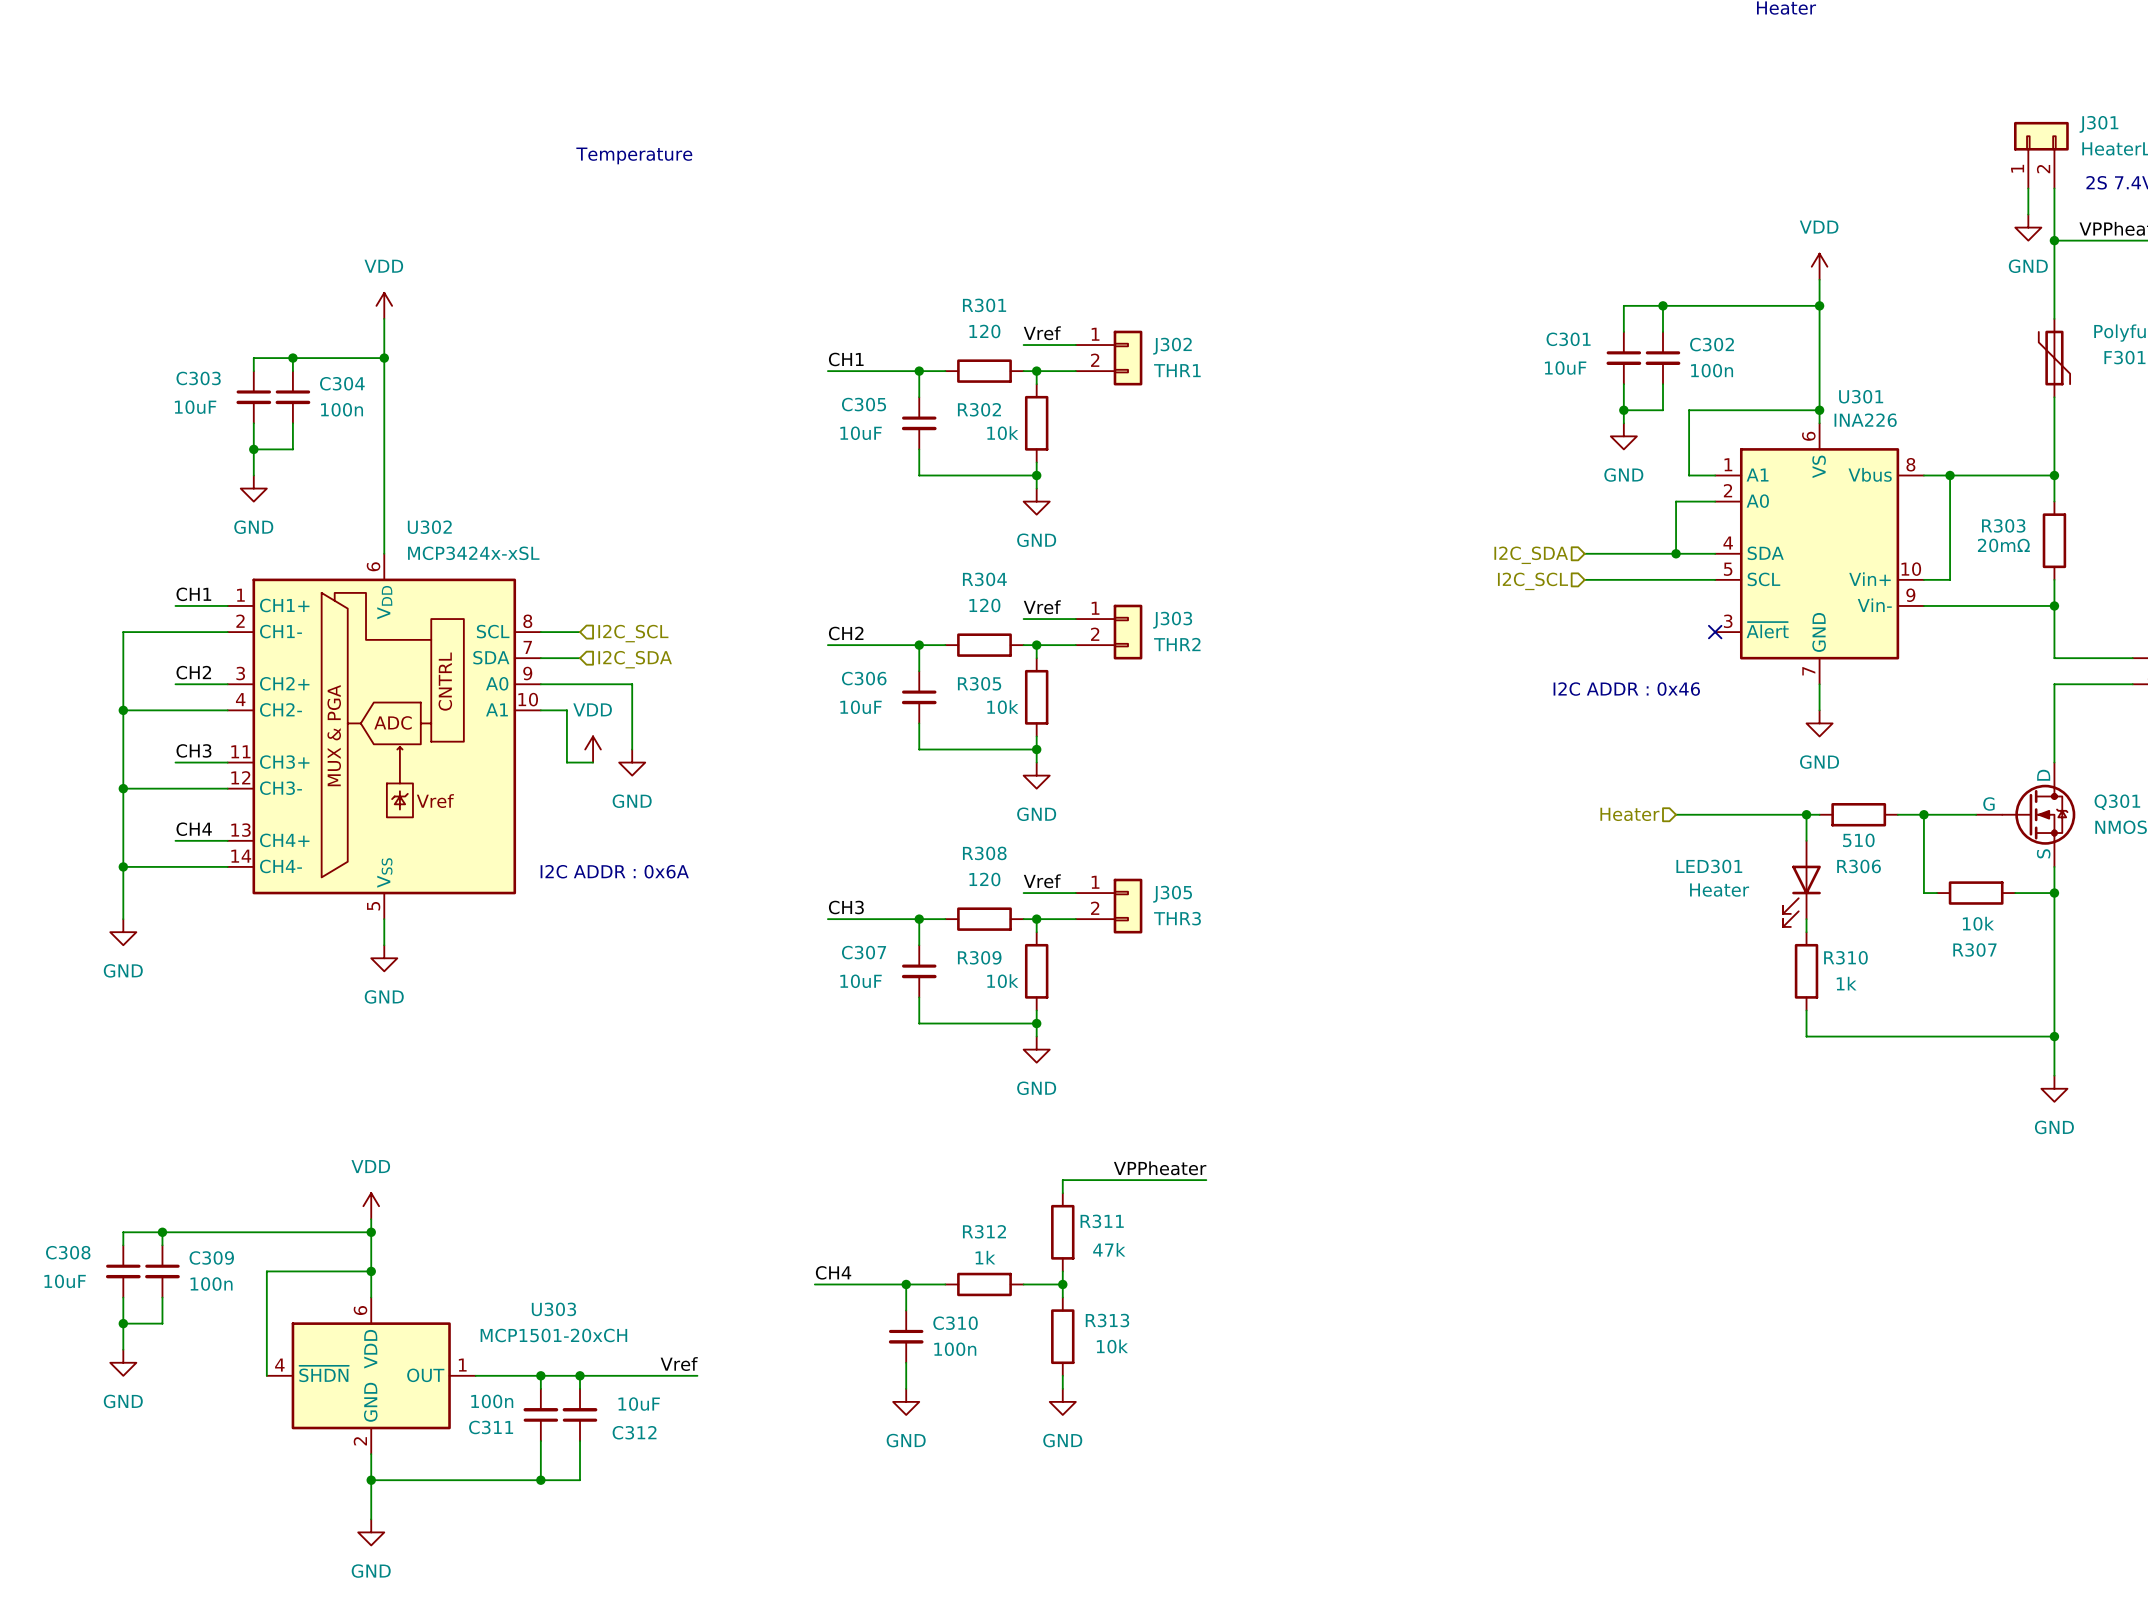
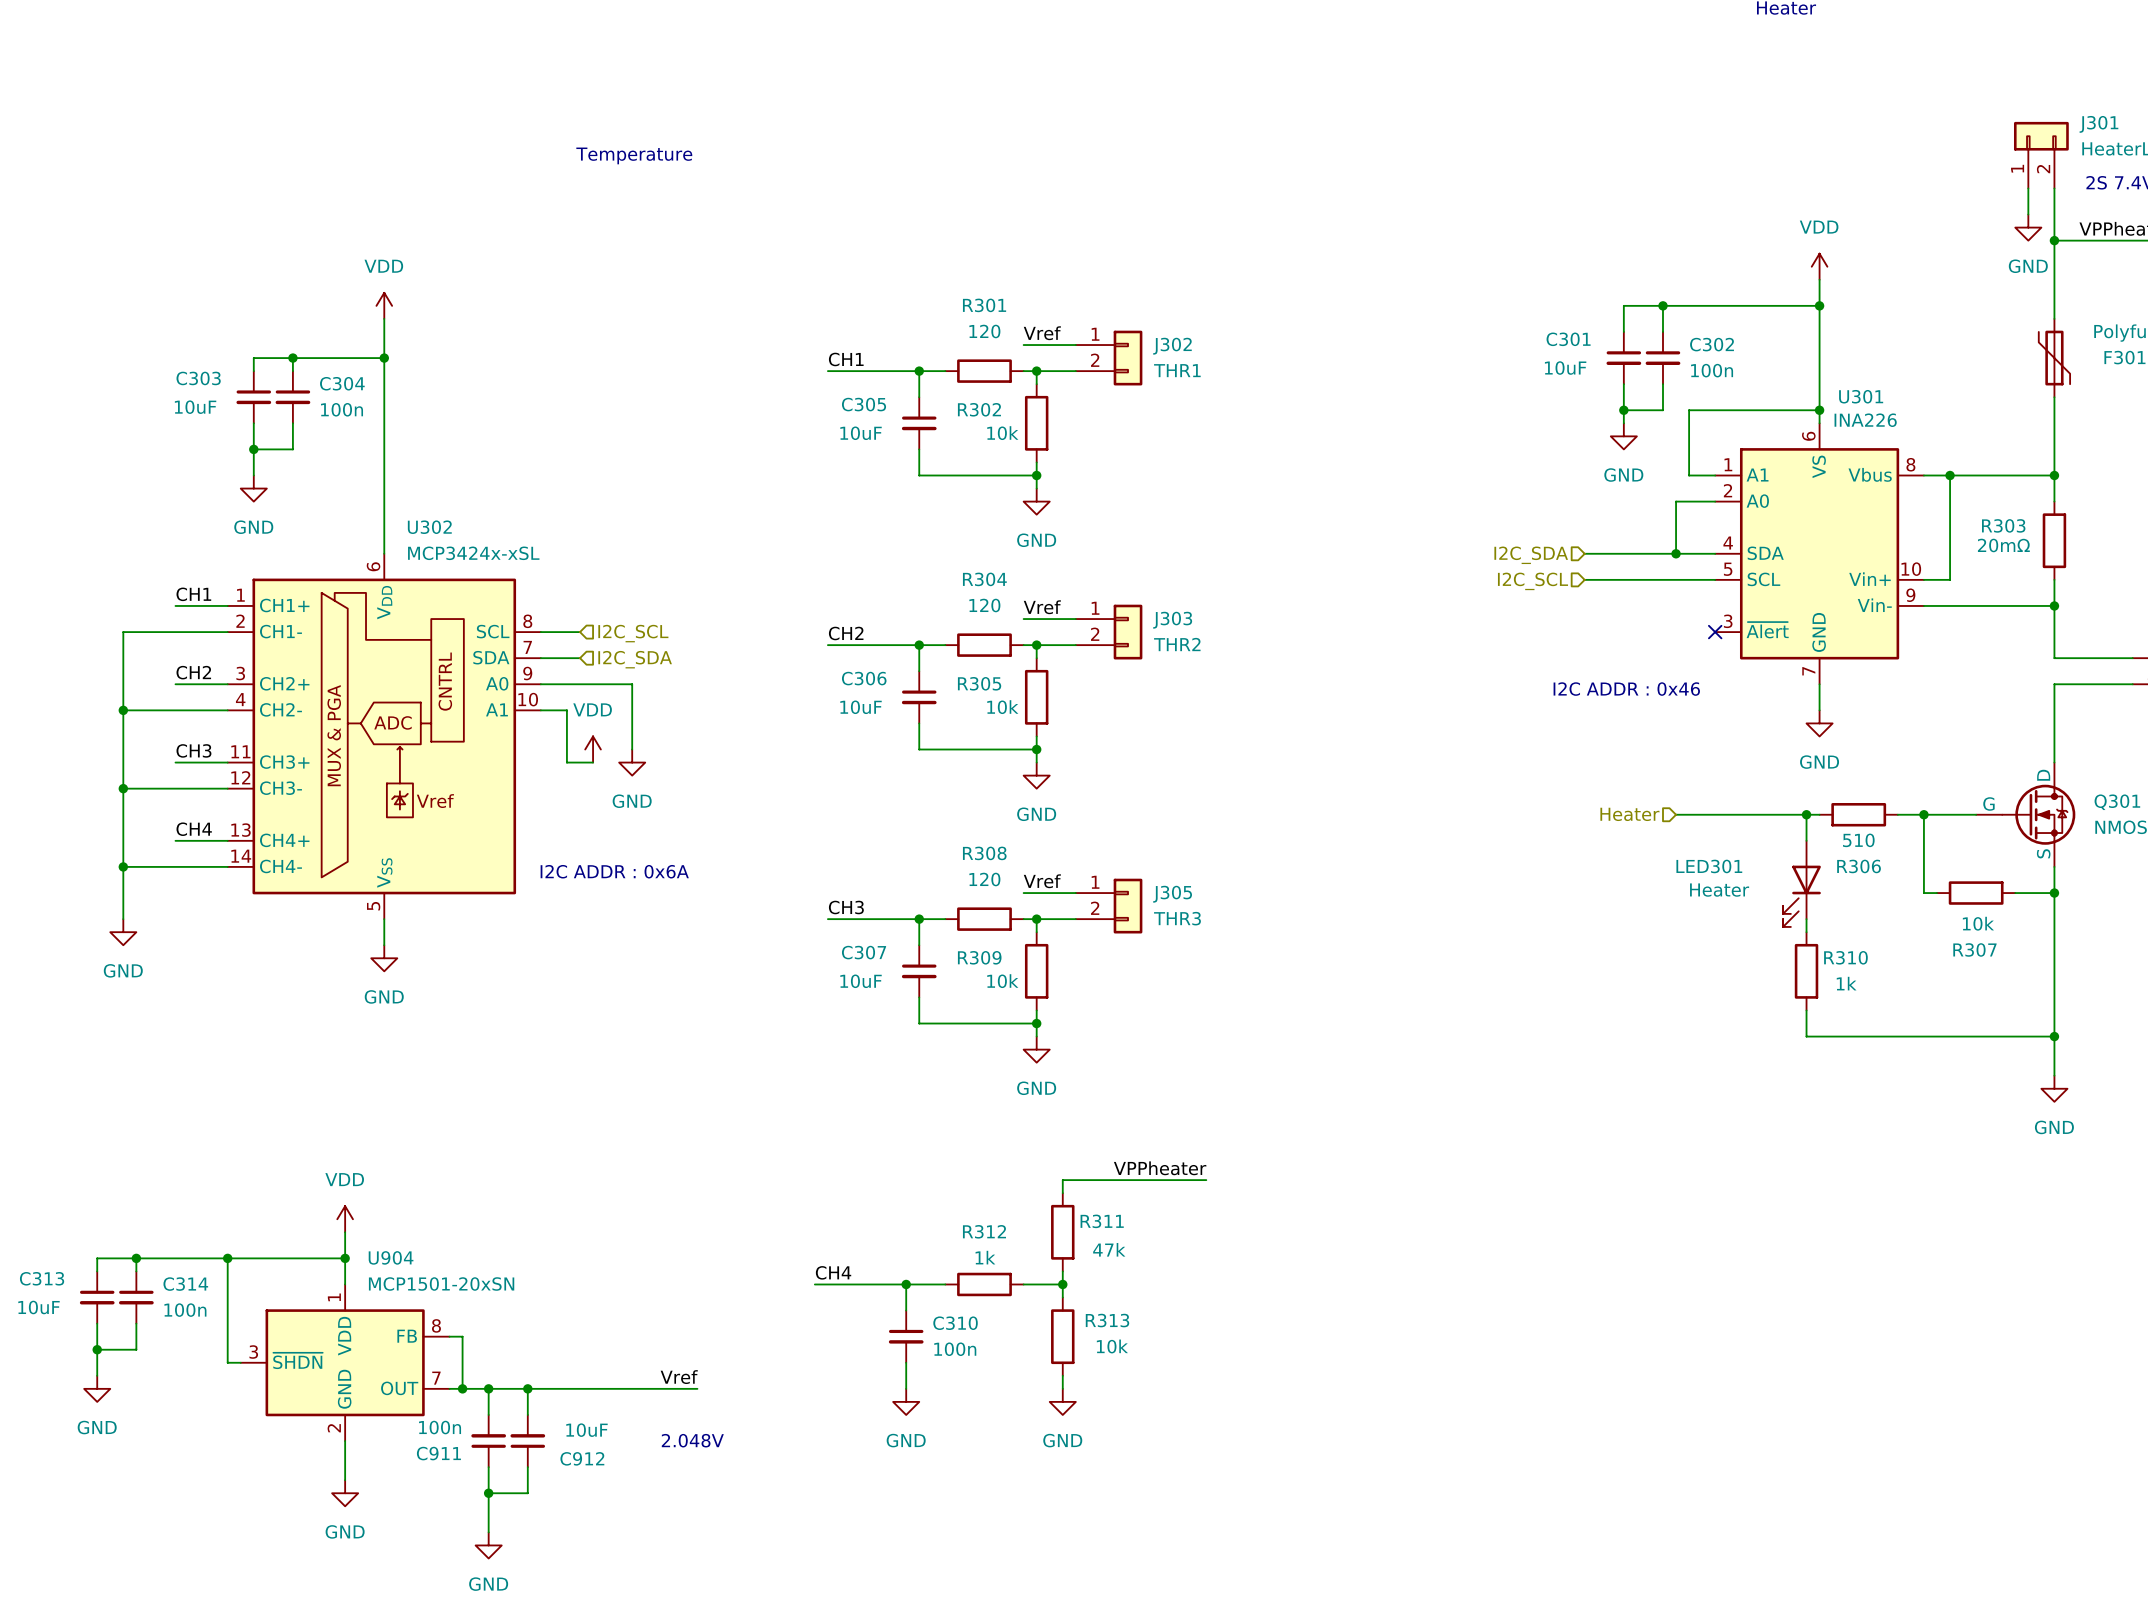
power symbol position: VDD (371, 1206) -> VDD (345, 1219)
wire: (371, 1219) (371, 1297) -> none
wire: (162, 1232) (162, 1245) -> (136, 1258) (136, 1271)
junction: (162, 1232) -> none
wire: none -> (345, 1232) (345, 1284)
wire: (371, 1232) (123, 1232) (123, 1245) -> (345, 1258) (97, 1258) (97, 1271)
junction: (371, 1232) -> none
junction: none -> (136, 1258)
wire: none -> (227, 1258) (227, 1362) (240, 1362)
junction: none -> (227, 1258)
junction: none -> (345, 1258)
C308: 10uF (123, 1271) -> none
C309: 100n (162, 1271) -> none
wire: (371, 1271) (266, 1271) (266, 1375) -> none
junction: (371, 1271) -> none
C313: none -> 10uF (97, 1297)
wire: (123, 1297) (123, 1349) -> (97, 1323) (97, 1375)
C314: none -> 100n (136, 1297)
wire: (162, 1297) (162, 1323) (123, 1323) -> (136, 1323) (136, 1349) (97, 1349)
junction: (123, 1323) -> none
wire: none -> (449, 1336) (462, 1336) (462, 1388)
junction: none -> (97, 1349)
power symbol position: GND (123, 1362) -> GND (97, 1388)
U904: none -> MCP1501-20xSN (345, 1362)
label position: Vref (679, 1364) -> Vref (679, 1377)
U303: MCP1501-20xCH (371, 1375) -> none
wire: (475, 1375) (697, 1375) -> none
wire: (540, 1375) (540, 1388) -> none
junction position: (540, 1375) -> (527, 1388)
wire: (580, 1375) (580, 1388) -> none
junction: (580, 1375) -> none
wire: none -> (449, 1388) (697, 1388)
junction: none -> (462, 1388)
wire: none -> (488, 1388) (488, 1414)
junction: none -> (488, 1388)
wire: none -> (527, 1388) (527, 1414)
C311: 100n (540, 1414) -> none
C312: 10uF (580, 1414) -> none
text: none -> 2.048V (692, 1440)
C911: none -> 100n (488, 1441)
C912: none -> 10uF (527, 1441)
wire: (540, 1441) (540, 1480) -> (345, 1441) (345, 1480)
wire: (580, 1441) (580, 1480) (371, 1480) -> none
wire: (371, 1454) (371, 1519) -> (488, 1467) (488, 1532)
wire: none -> (527, 1467) (527, 1493) (488, 1493)
junction: (371, 1480) -> none
junction: (540, 1480) -> none
junction: none -> (488, 1493)
power symbol position: GND (371, 1532) -> GND (345, 1493)
power symbol: none -> GND (488, 1545)

